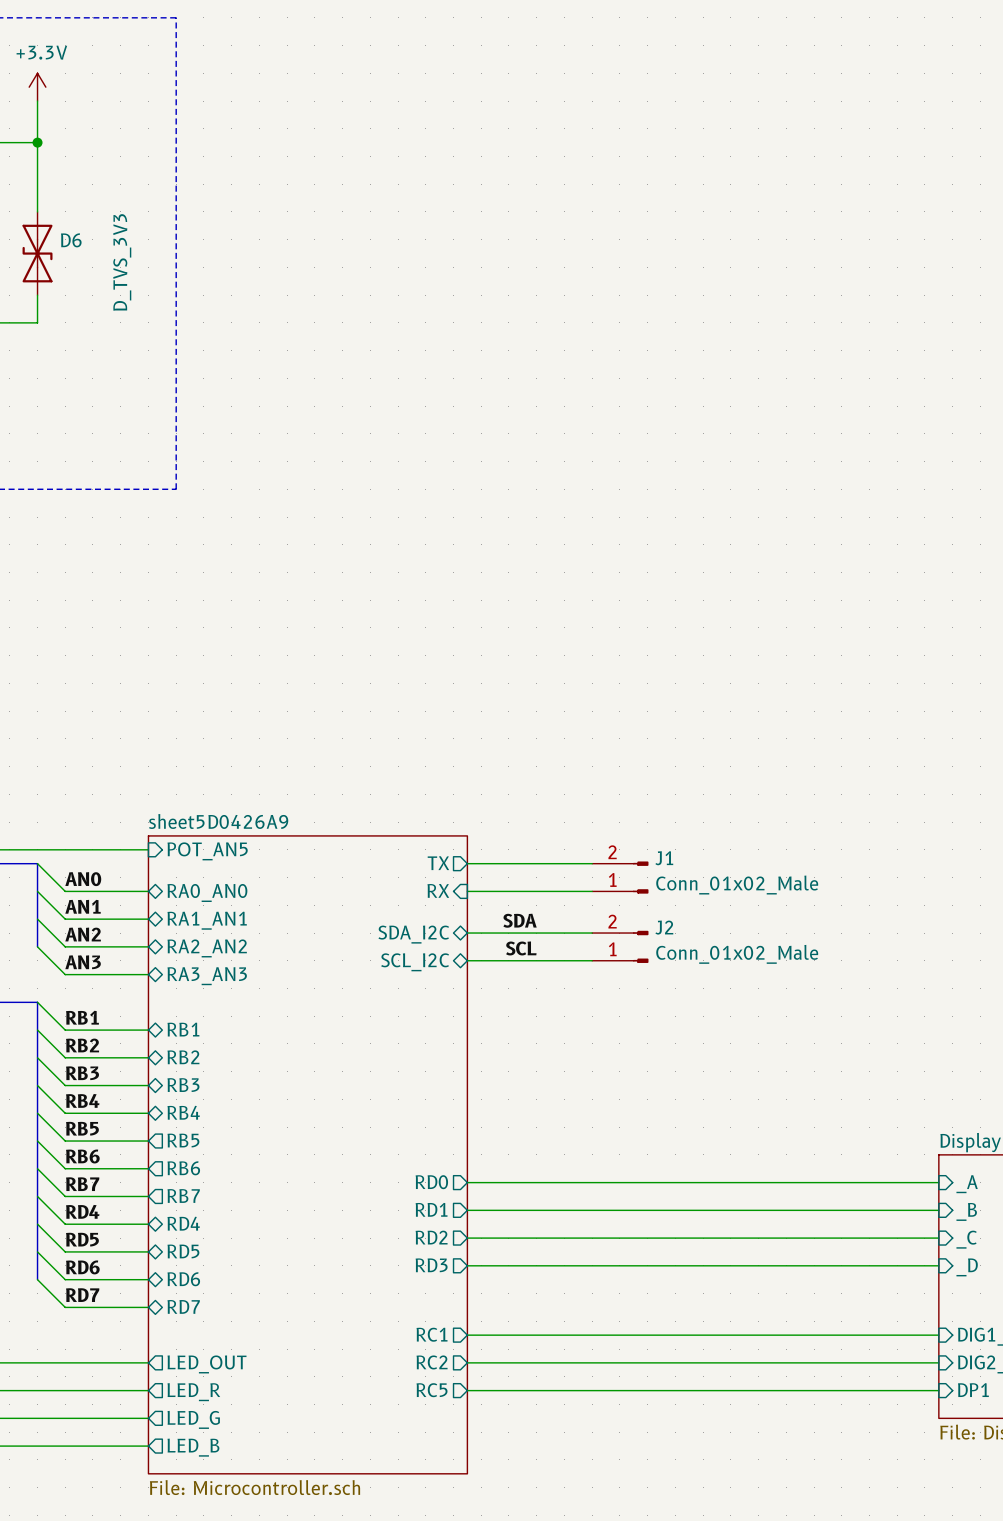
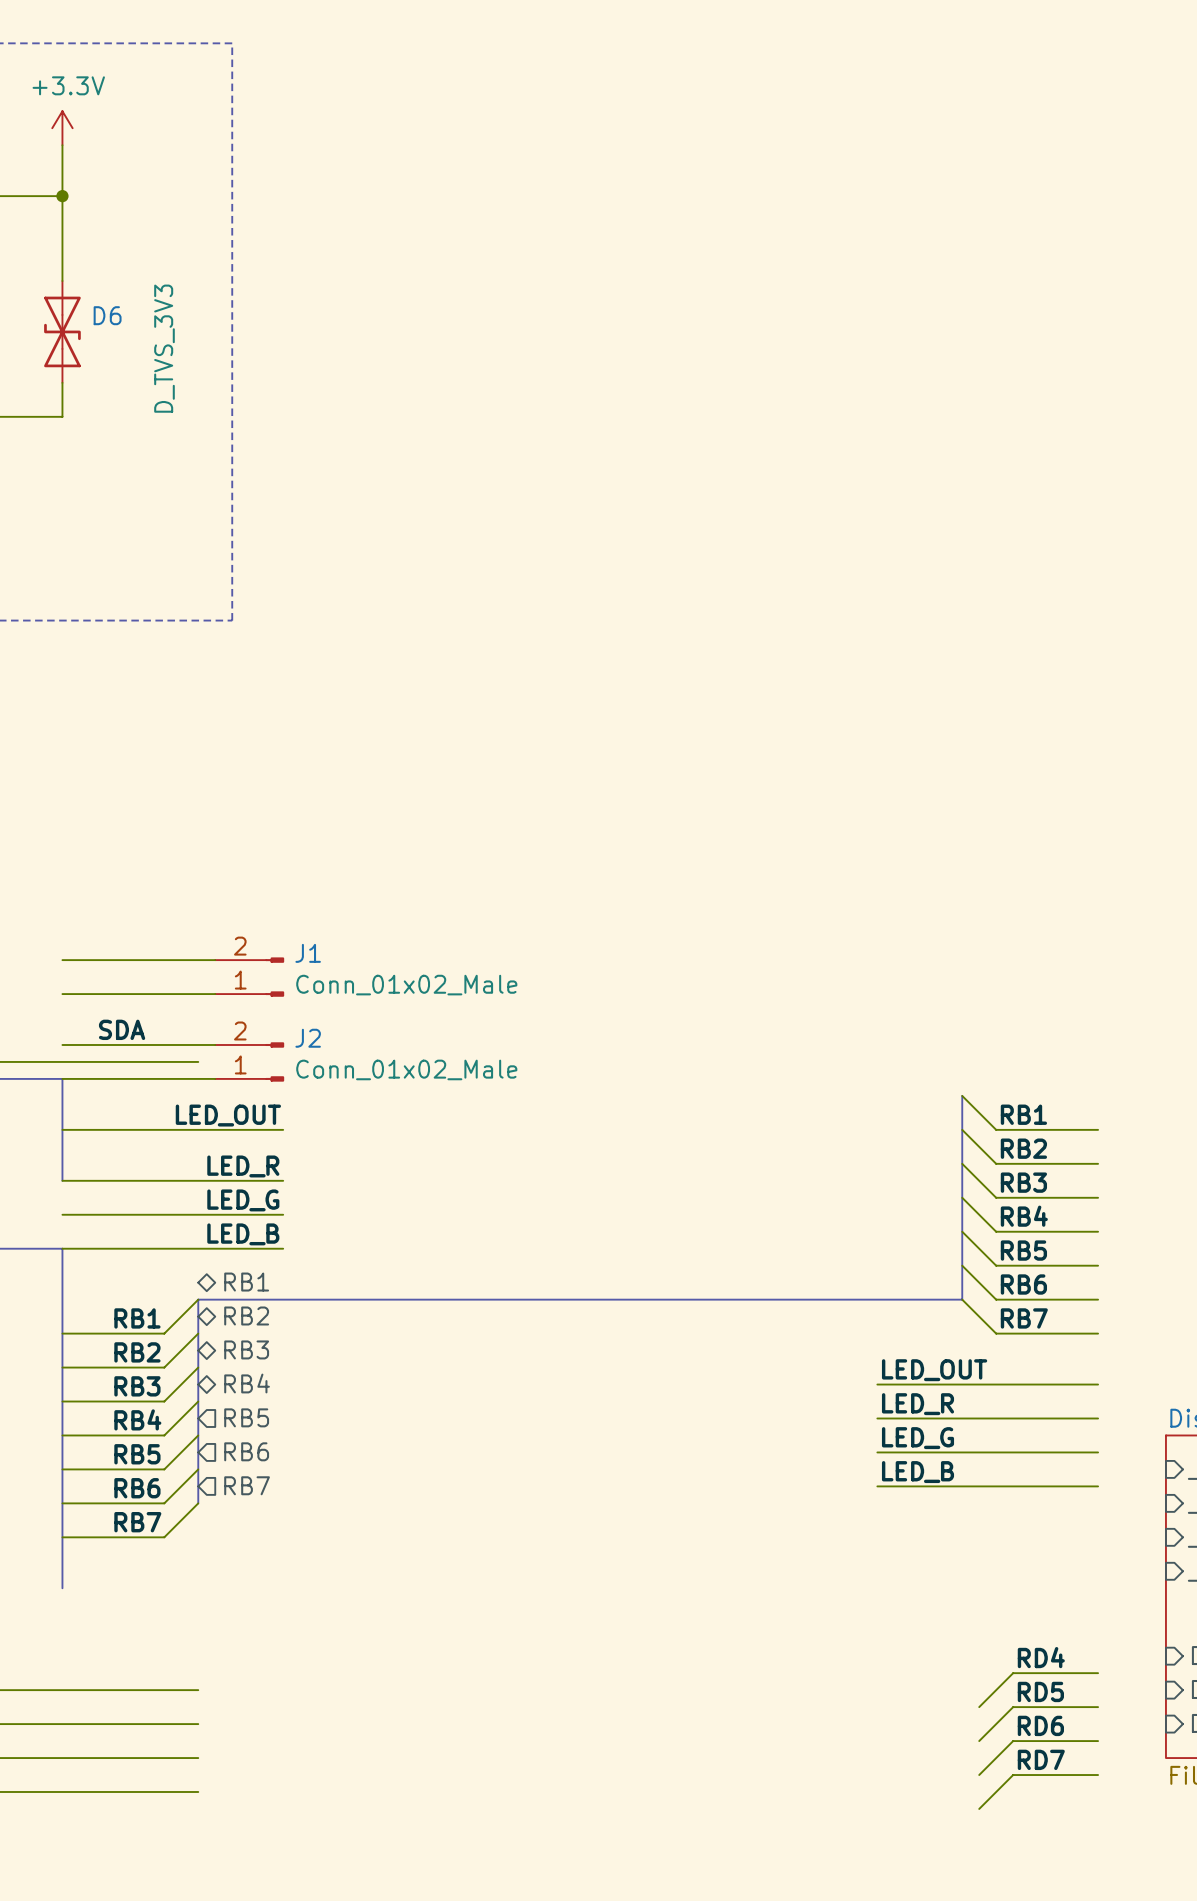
wire: none -> (62, 960) (215, 960)
wire: none -> (62, 994) (215, 994)
label: none -> SDA (122, 1029)
wire: none -> (62, 1044) (215, 1044)
sheet pin: POT_AN5 (207, 851) -> none
wire: (37, 863) (65, 891) (148, 891) -> (62, 1078) (215, 1078)
sheet pin: TX (438, 863) -> none
wire: (467, 863) (592, 863) -> none
J1 position: (620, 877) -> (249, 977)
wire: none -> (962, 1095) (996, 1129) (1098, 1129)
bus: none -> (962, 1095) (962, 1299) (198, 1299) (198, 1503)
label: AN0 (83, 879) -> none
sheet pin: RX (438, 890) -> none
wire: (37, 891) (65, 919) (148, 919) -> none
wire: (467, 891) (592, 891) -> none
sheet pin: RA0_AN0 (207, 892) -> none
label: none -> RB1 (1023, 1114)
label: none -> LED_OUT (228, 1115)
wire: none -> (62, 1129) (283, 1129)
wire: none -> (962, 1129) (996, 1163) (1098, 1163)
label: AN1 (83, 906) -> none
wire: (37, 919) (65, 946) -> (62, 1180) (96, 1180)
sheet pin: RA1_AN1 (207, 920) -> none
label: SDA (520, 920) -> none
label: none -> RB2 (1023, 1148)
wire: (467, 933) (592, 933) -> none
wire: none -> (962, 1163) (996, 1197) (1098, 1197)
label: AN2 (83, 934) -> none
sheet pin: SDA_I2C (413, 934) -> none
label: none -> LED_R (243, 1166)
wire: (37, 946) (65, 974) -> (62, 1214) (96, 1214)
wire: none -> (198, 1180) (283, 1180)
J2 position: (620, 946) -> (249, 1061)
sheet pin: RA2_AN2 (207, 948) -> none
label: SCL (521, 948) -> none
label: none -> RB3 (1023, 1182)
wire: (467, 960) (592, 960) -> none
wire: none -> (962, 1197) (996, 1231) (1098, 1231)
label: AN3 (83, 962) -> none
sheet pin: SCL_I2C (415, 962) -> none
label: none -> LED_G (243, 1200)
wire: none -> (198, 1214) (283, 1214)
sheet pin: RA3_AN3 (207, 976) -> none
label: none -> RB4 (1024, 1216)
wire: none -> (962, 1231) (996, 1265) (1098, 1265)
label: none -> LED_B (243, 1234)
wire: (37, 1002) (65, 1030) (148, 1030) -> (62, 1248) (283, 1248)
label: none -> RB5 (1023, 1250)
wire: none -> (962, 1265) (996, 1299) (1098, 1299)
label position: RB1 (82, 1017) -> RB1 (137, 1318)
wire: (37, 1030) (65, 1057) (148, 1057) -> none
label: none -> RB6 (1023, 1284)
wire: none -> (198, 1299) (164, 1333) (62, 1333)
wire: none -> (962, 1299) (996, 1333) (1098, 1333)
label position: RB2 (82, 1045) -> RB2 (137, 1352)
wire: (37, 1057) (65, 1085) (148, 1085) -> none
label: none -> RB7 (1024, 1318)
wire: none -> (198, 1333) (164, 1367) (62, 1367)
label position: RB3 (82, 1073) -> RB3 (137, 1386)
wire: (37, 1085) (65, 1113) (148, 1113) -> none
wire: none -> (198, 1367) (164, 1401) (62, 1401)
label position: RB4 (82, 1100) -> RB4 (137, 1419)
label: none -> LED_OUT (934, 1370)
wire: (37, 1113) (65, 1141) (148, 1141) -> none
wire: none -> (877, 1384) (1098, 1384)
wire: none -> (198, 1401) (164, 1435) (62, 1435)
label position: RB5 (82, 1128) -> RB5 (137, 1454)
label: none -> LED_R (917, 1404)
wire: (37, 1141) (65, 1168) (148, 1168) -> none
wire: none -> (877, 1418) (1098, 1418)
wire: none -> (198, 1435) (164, 1469) (62, 1469)
sheet sheet5D0426A9: File: Microcontroller.sch (307, 1154) -> none
label position: RB6 (82, 1156) -> RB6 (137, 1488)
label: none -> LED_G (917, 1438)
wire: (37, 1168) (65, 1196) (148, 1196) -> none
wire: none -> (877, 1452) (1098, 1452)
wire: none -> (198, 1469) (164, 1503) (62, 1503)
sheet pin: RD0 (431, 1182) -> none
wire: (467, 1182) (938, 1182) -> none
label position: RB7 (82, 1184) -> RB7 (137, 1522)
label: none -> LED_B (917, 1472)
wire: (37, 1196) (65, 1224) (148, 1224) -> none
wire: none -> (877, 1486) (1098, 1486)
sheet pin: RD1 (431, 1209) -> none
wire: none -> (198, 1503) (164, 1537) (62, 1537)
wire: (467, 1210) (938, 1210) -> none
label: RD4 (82, 1211) -> none
sheet pin: RD4 (183, 1223) -> none
wire: (37, 1224) (65, 1251) (148, 1251) -> none
sheet pin: RD2 (431, 1237) -> none
wire: (467, 1238) (938, 1238) -> none
label: RD5 (82, 1239) -> none
wire: (37, 1251) (65, 1279) (148, 1279) -> none
sheet pin: RD5 (183, 1251) -> none
sheet pin: RD3 (431, 1265) -> none
wire: (467, 1265) (938, 1265) -> none
label: RD6 (82, 1267) -> none
wire: (37, 1279) (65, 1307) (148, 1307) -> none
sheet pin: RD6 (183, 1279) -> none
label: RD7 (82, 1295) -> none
sheet pin: RD7 (183, 1306) -> none
sheet pin: RC1 (432, 1334) -> none
wire: (467, 1335) (938, 1335) -> none
label: none -> RD4 (1041, 1657)
wire: none -> (1098, 1673) (1013, 1673) (979, 1707)
sheet pin: RC2 (432, 1362) -> none
wire: (467, 1362) (938, 1362) -> none
sheet pin: LED_OUT (207, 1364) -> none
label: none -> RD5 (1040, 1691)
wire: none -> (1098, 1707) (1013, 1707) (979, 1741)
sheet pin: RC5 (432, 1390) -> none
wire: (467, 1390) (938, 1390) -> none
sheet pin: LED_R (193, 1392) -> none
label: none -> RD6 (1040, 1725)
wire: none -> (1098, 1741) (1013, 1741) (979, 1775)
sheet pin: LED_G (193, 1419) -> none
label: none -> RD7 (1041, 1759)
wire: none -> (1098, 1775) (1013, 1775) (979, 1808)
sheet pin: LED_B (193, 1447) -> none

